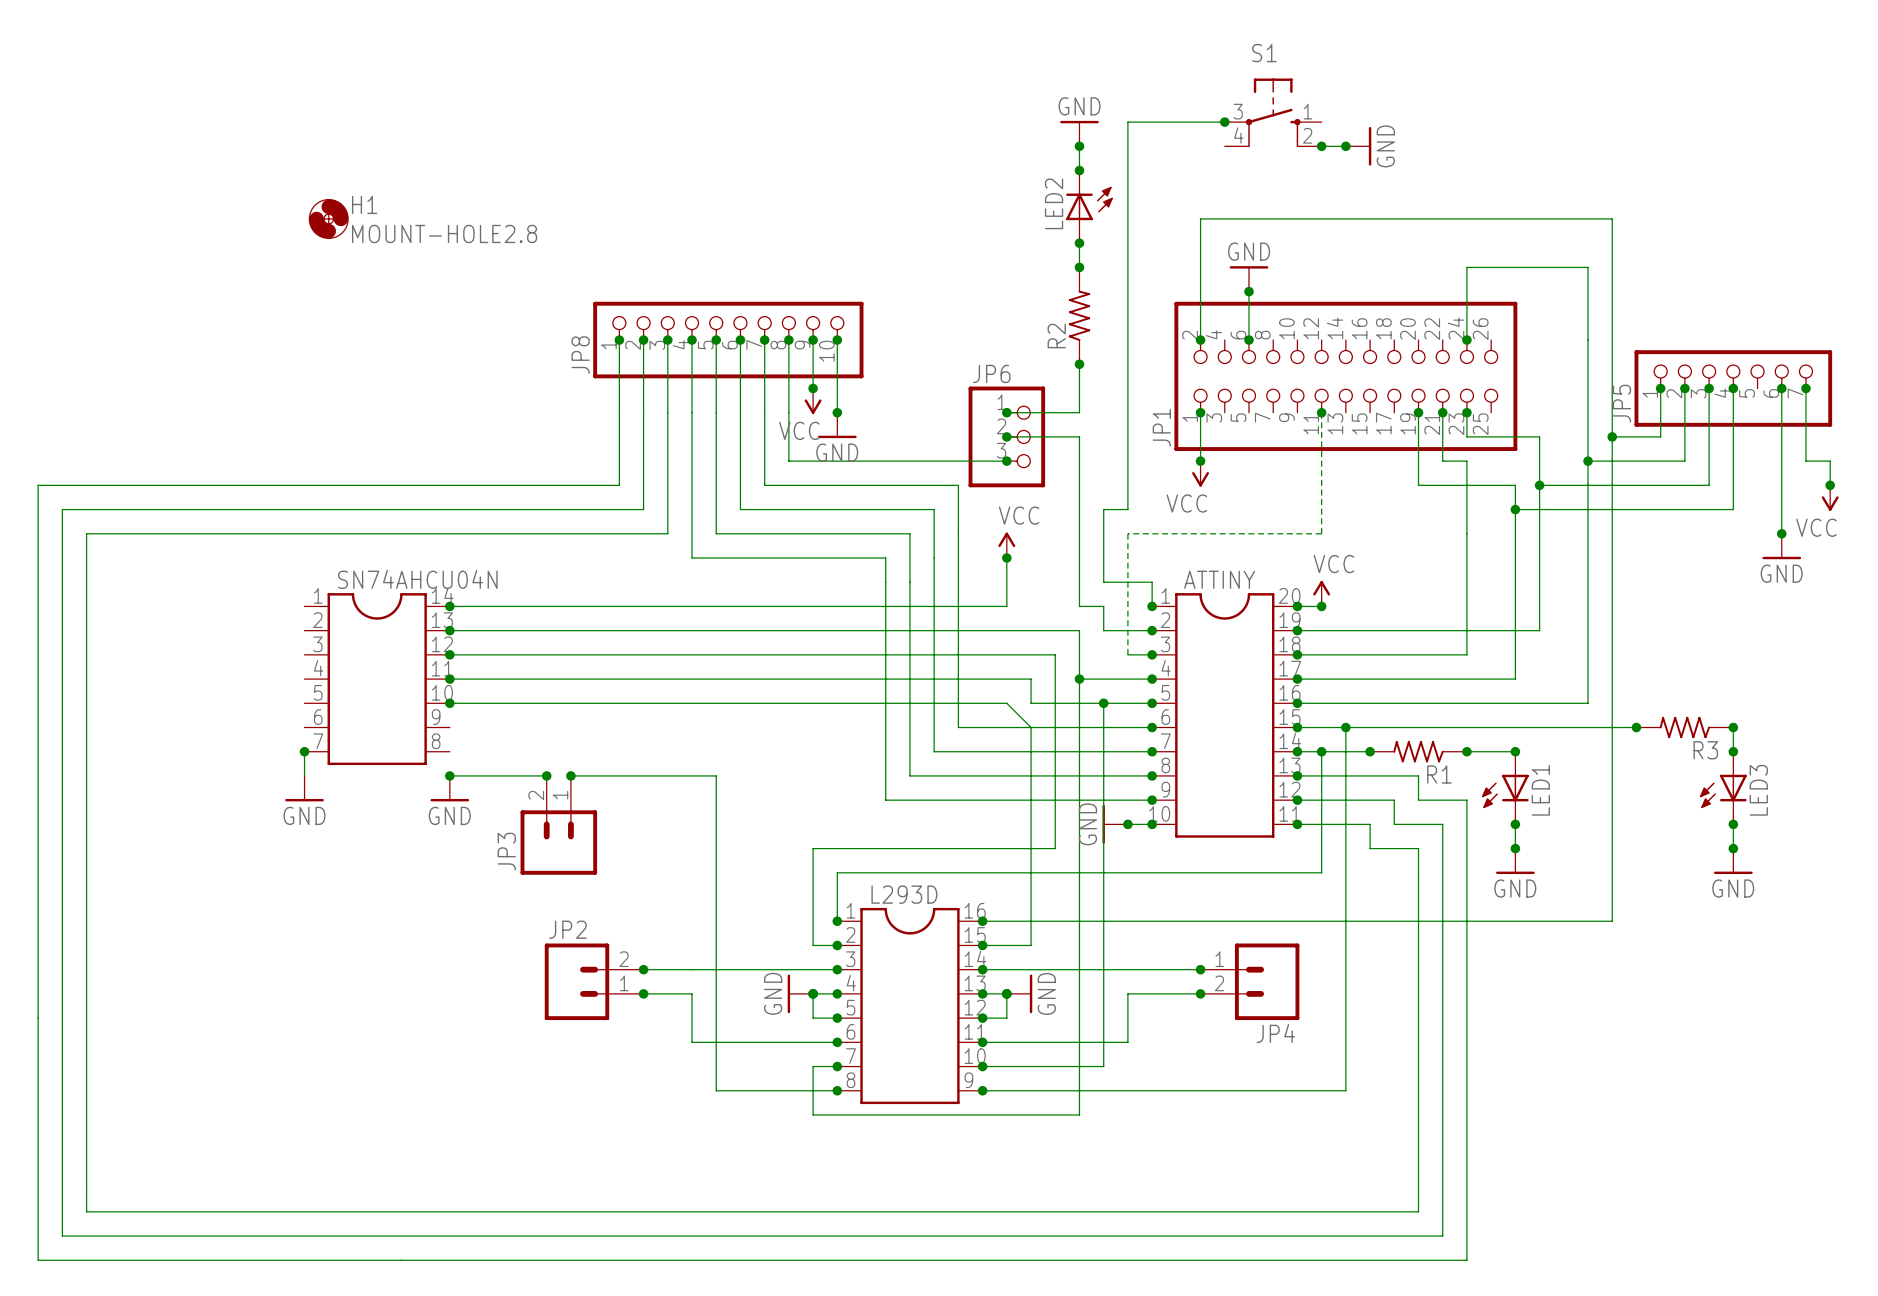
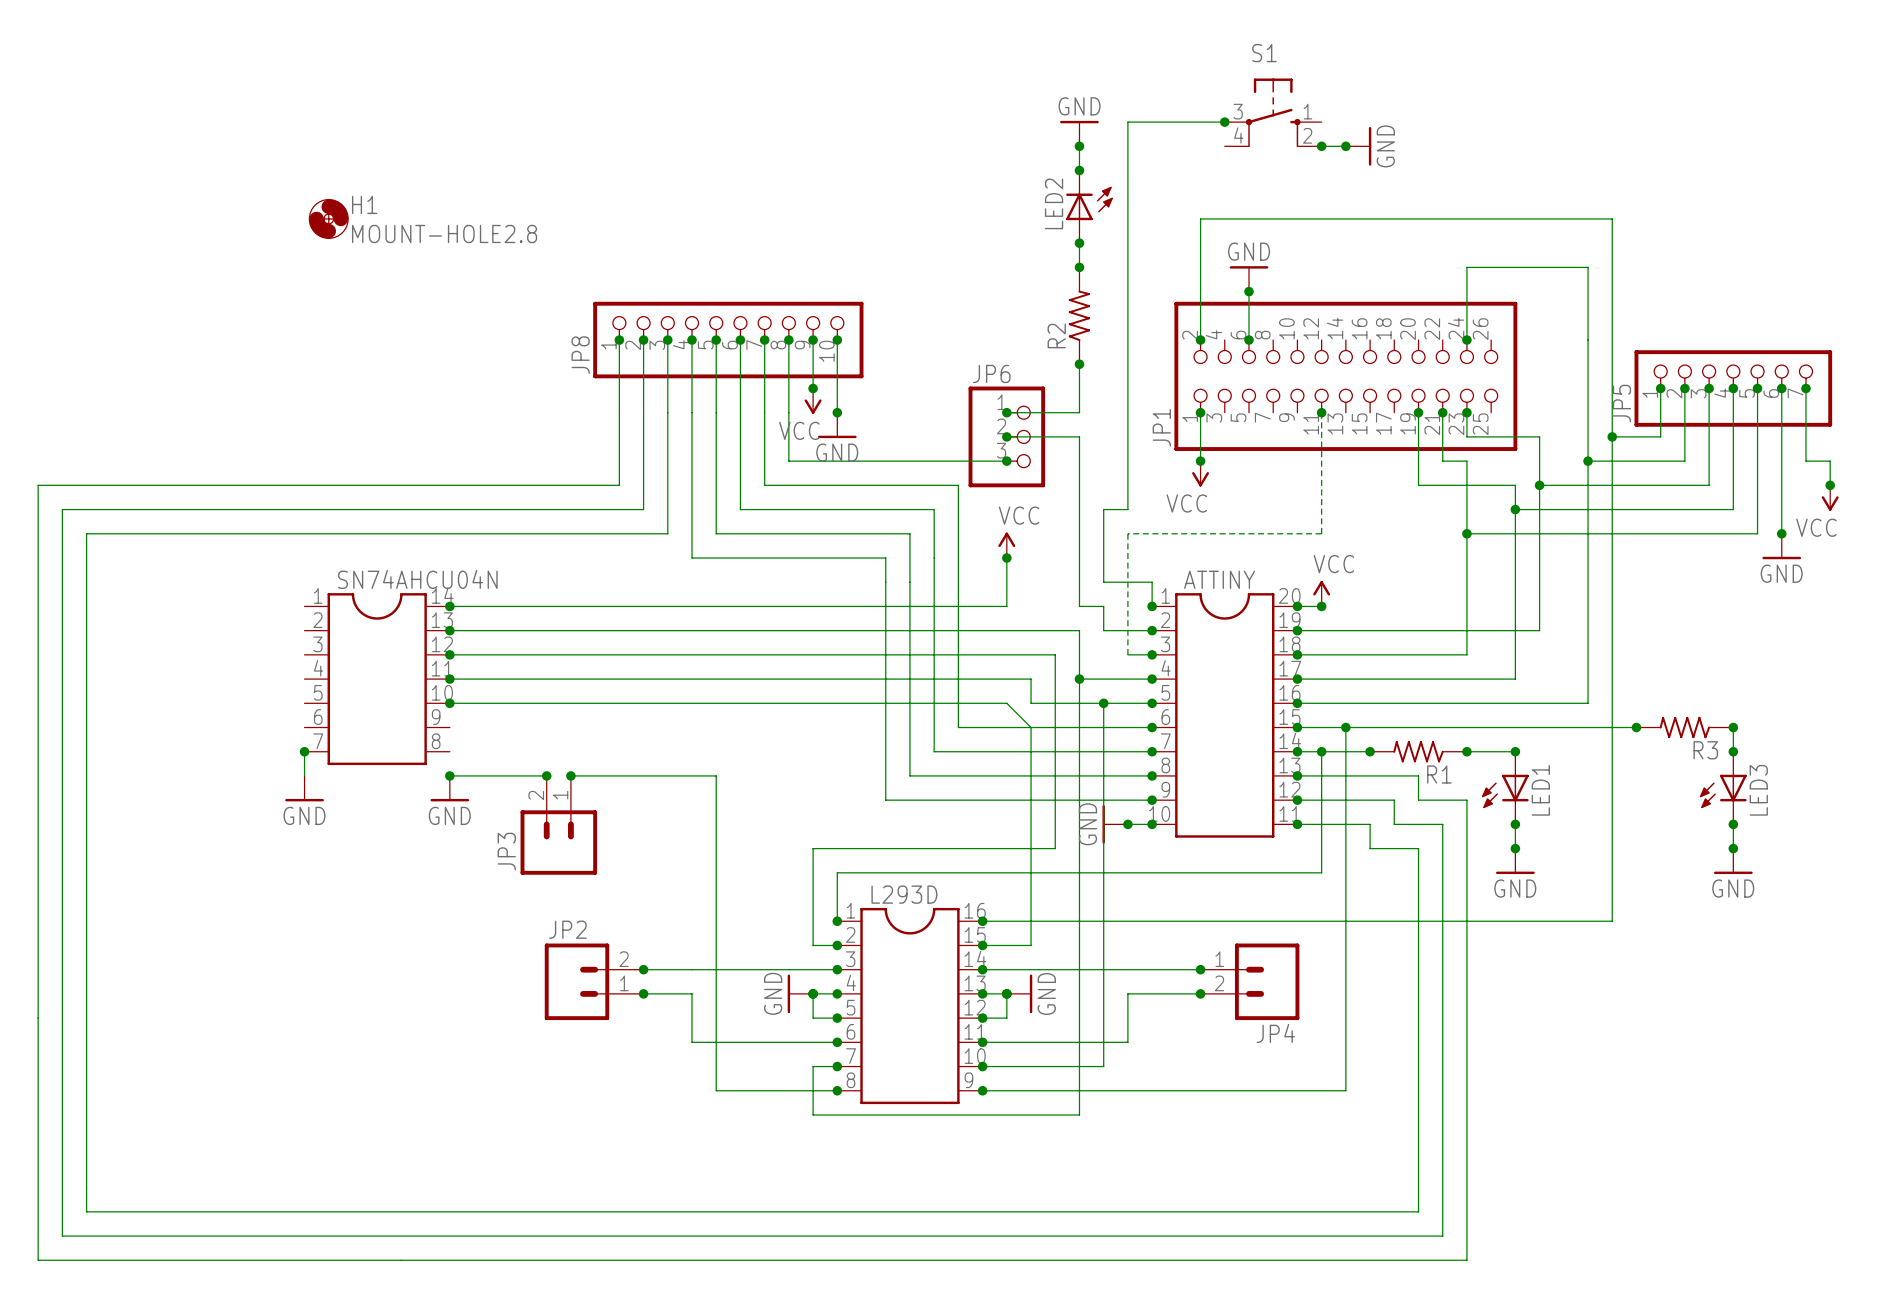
wire: none -> (1757, 388) (1757, 533) (1466, 533)
junction: none -> (1757, 388)
junction: none -> (1466, 533)

